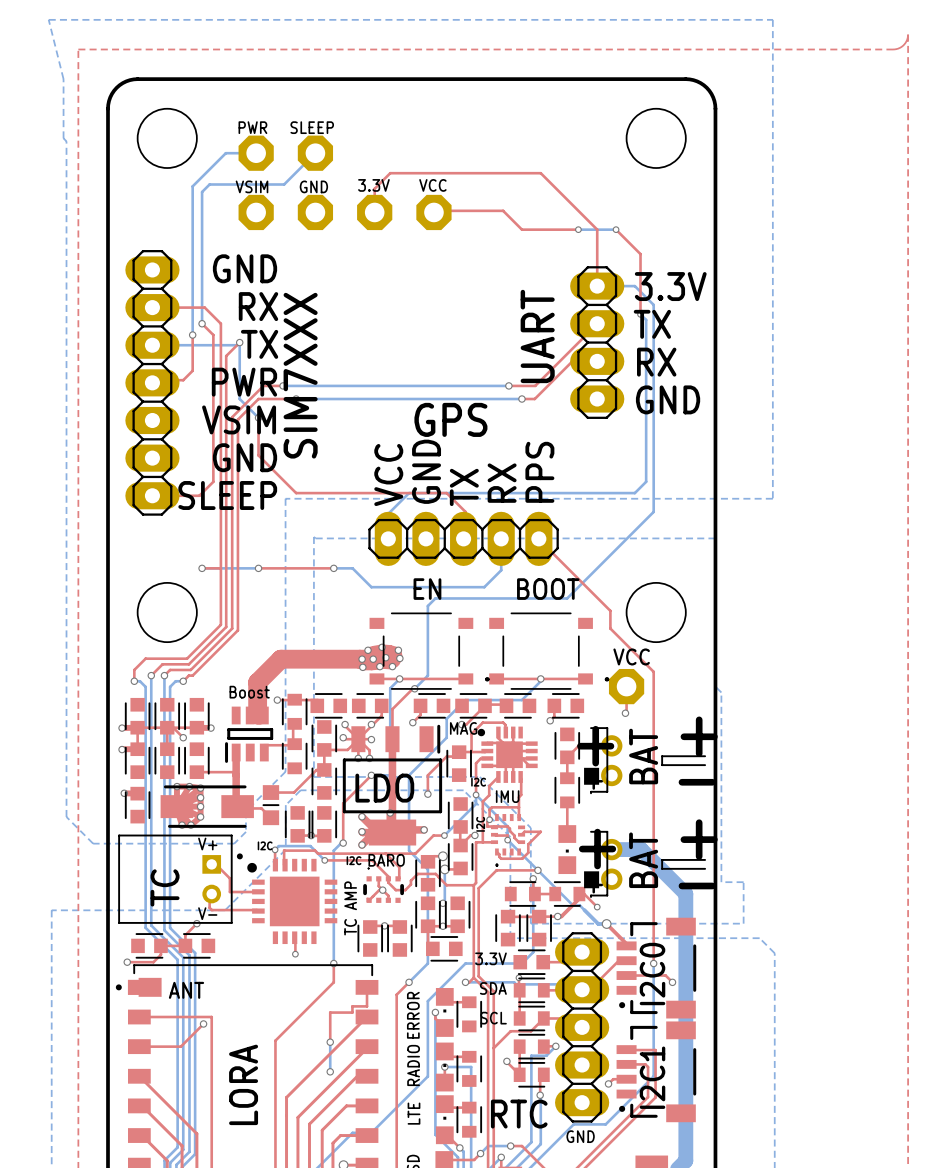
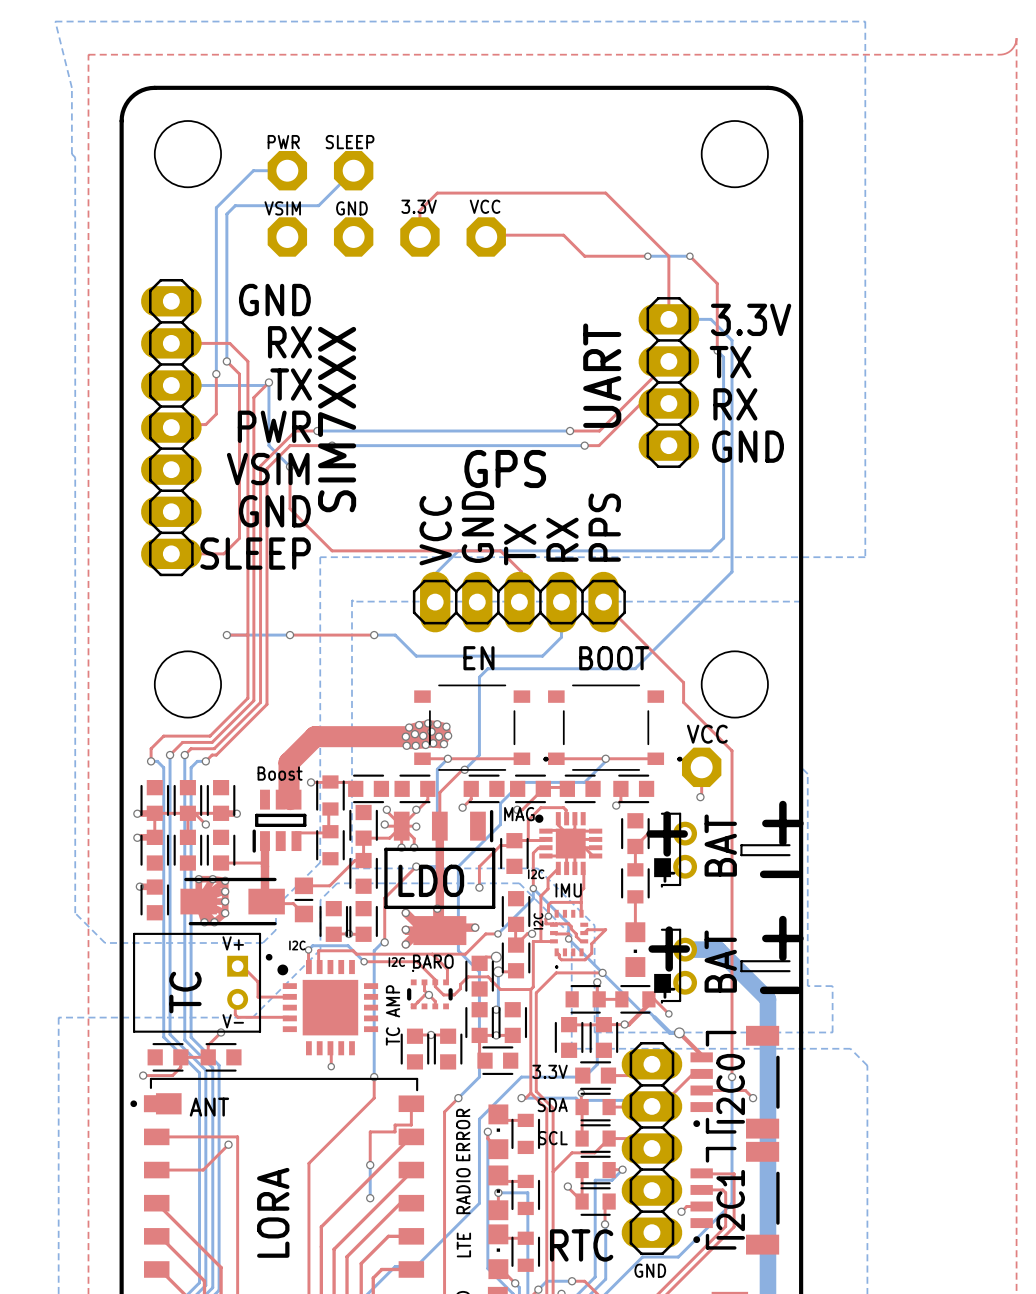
via: none -> (419, 725)
via: none -> (437, 724)
via: (368, 650) -> none
via: none -> (409, 727)
via: none -> (431, 731)
via: none -> (414, 734)
via: (385, 657) -> none
via: none -> (423, 735)
via: (373, 659) -> none
via: none -> (439, 736)
via: none -> (433, 743)
via: none -> (443, 744)
via: (392, 666) -> none
via: none -> (415, 745)

